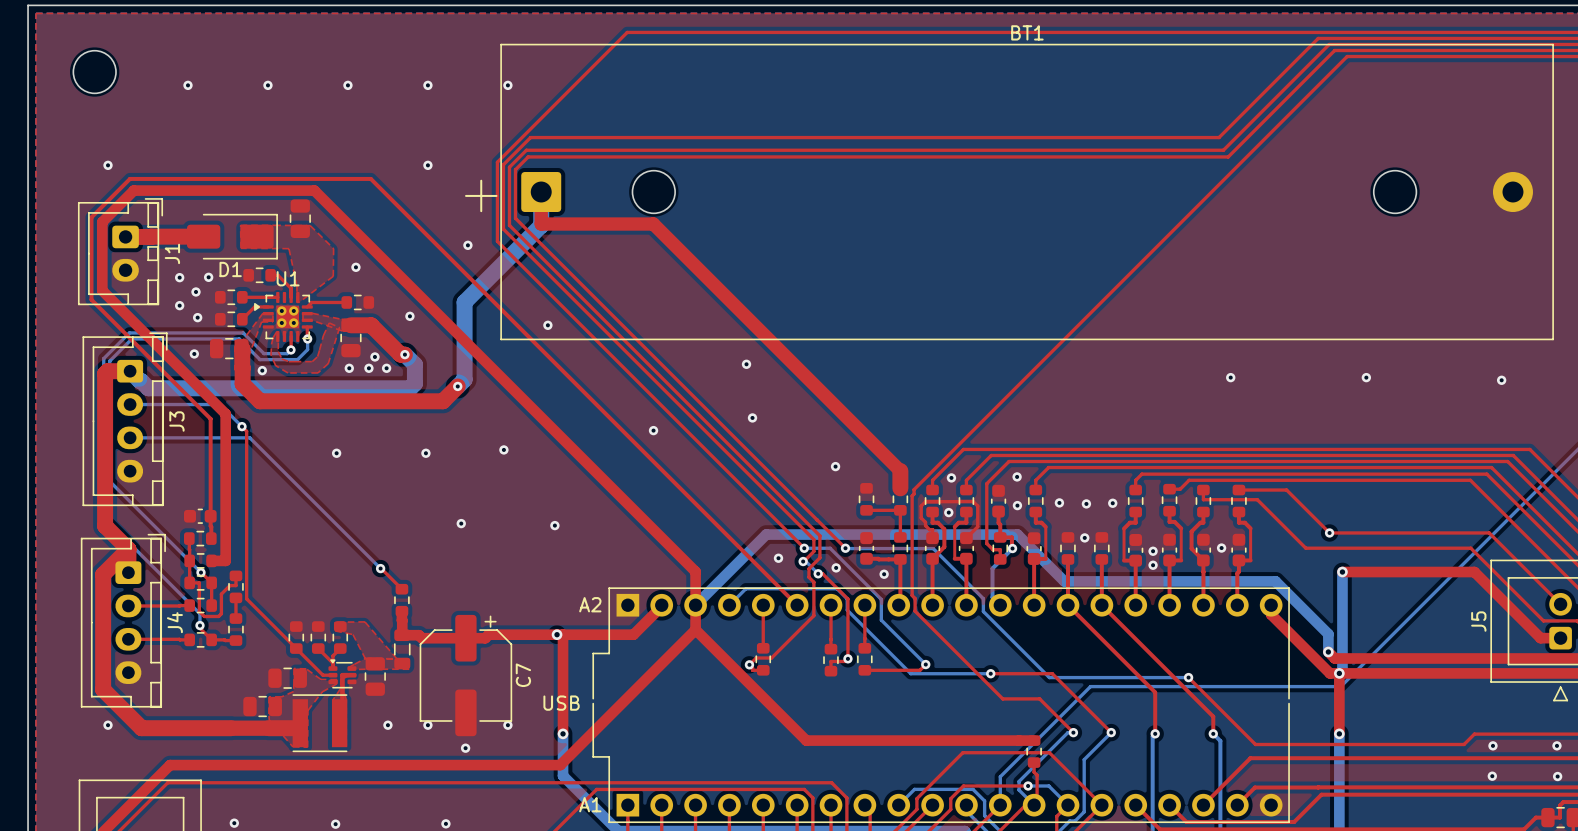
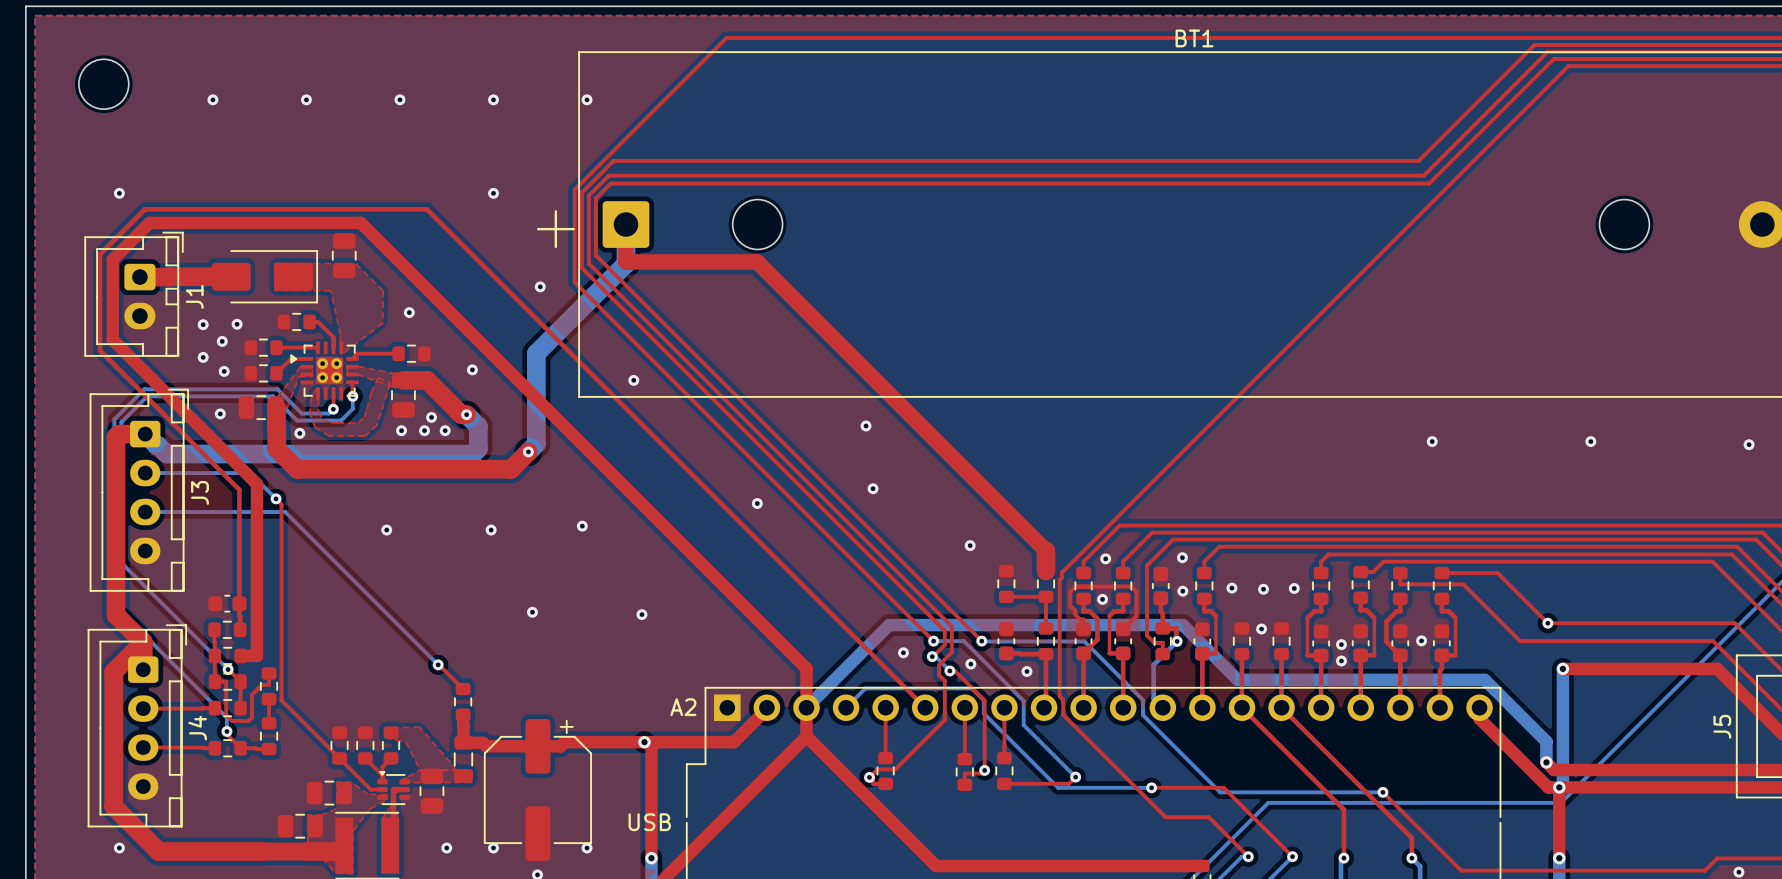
D1 name: D1 (230, 269) -> none
U1 name: U1 (288, 278) -> none
C7 name: C7 (523, 675) -> none

